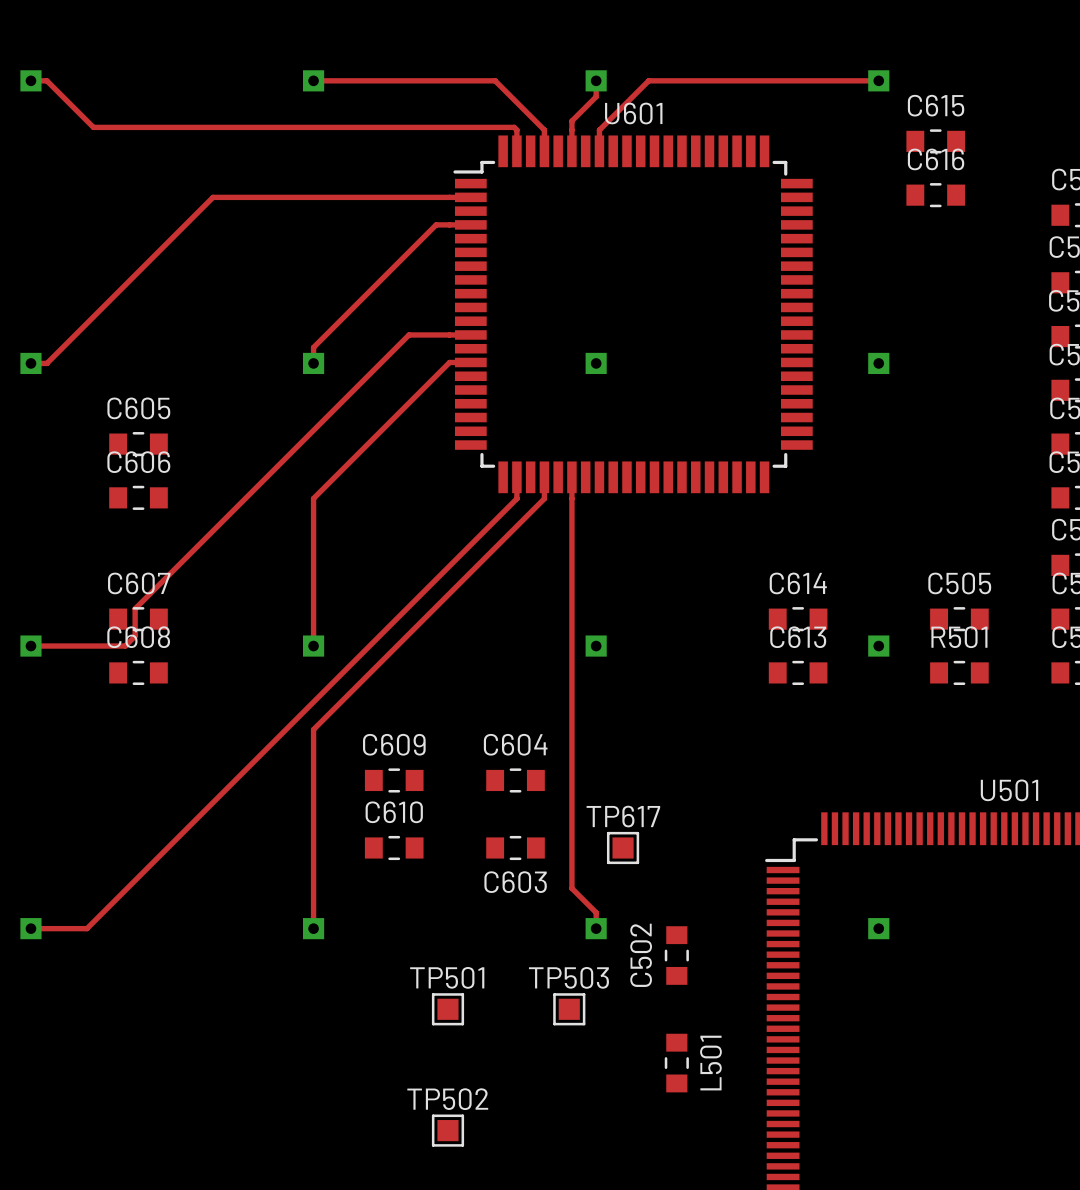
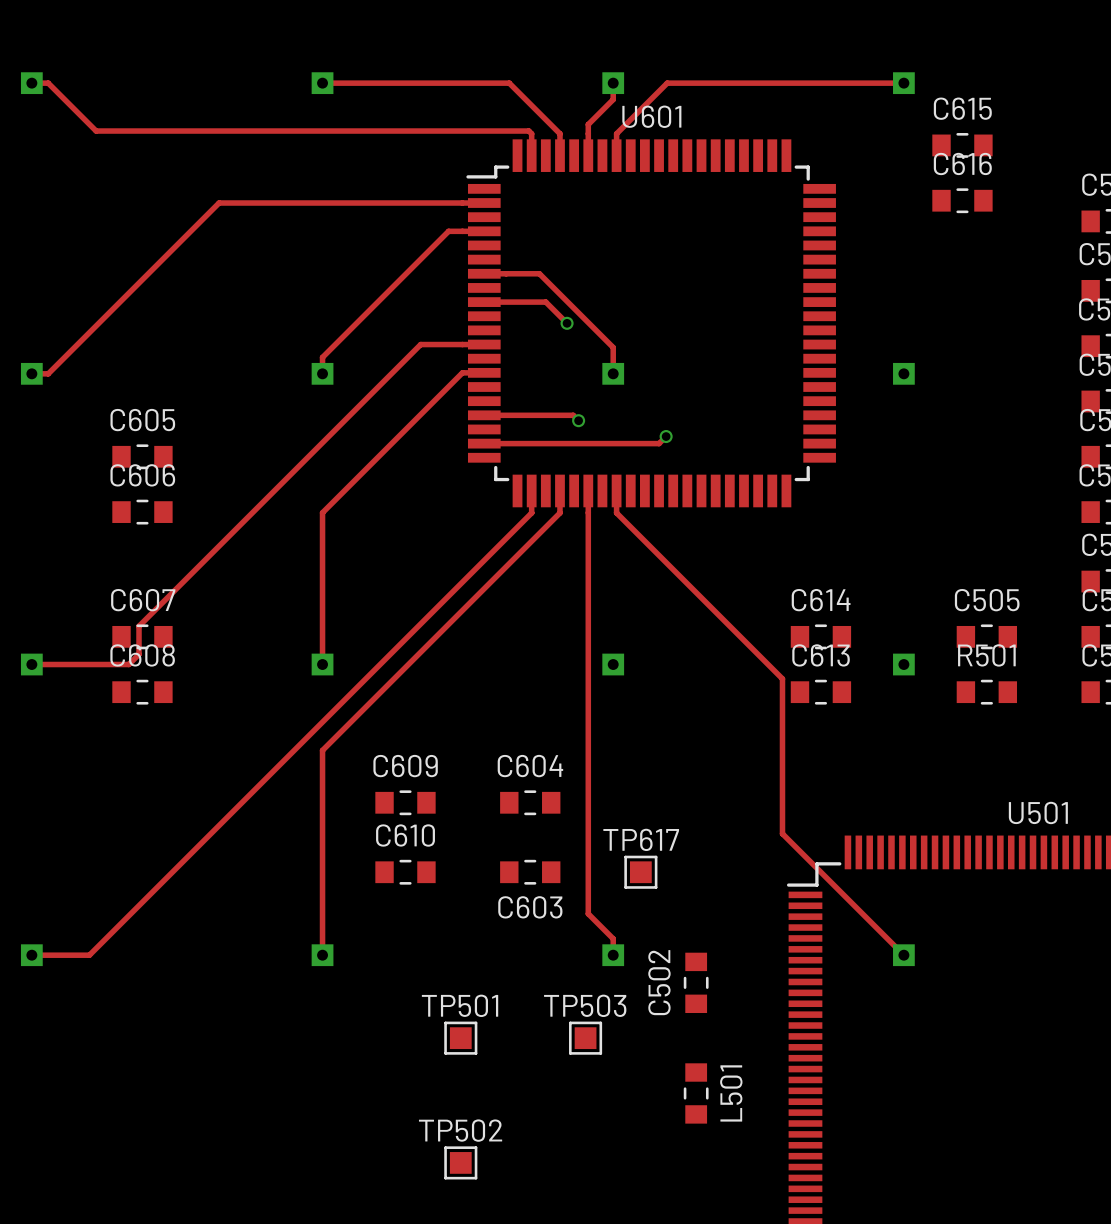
track: none -> (484, 273) (539, 273) (613, 347) (613, 373)
track: none -> (484, 302) (545, 302) (567, 323)
via: none -> (567, 323)
track: none -> (484, 415) (573, 415) (578, 420)
via: none -> (578, 420)
track: none -> (666, 436) (659, 443) (484, 443)
via: none -> (666, 436)
track: none -> (616, 490) (616, 512) (782, 678) (782, 833) (903, 955)

